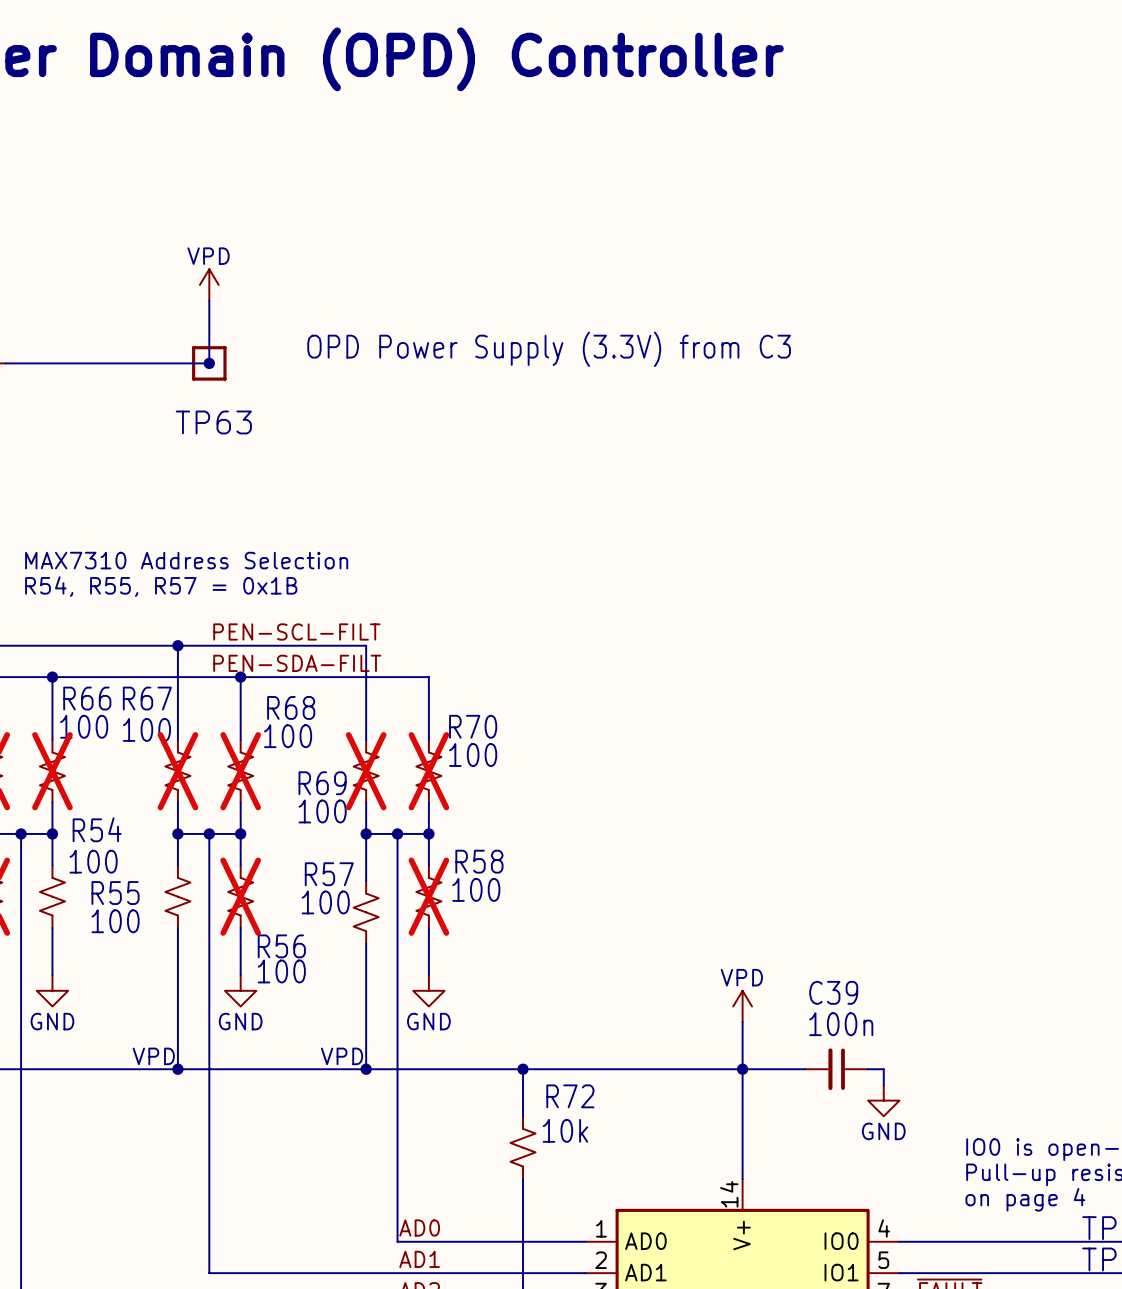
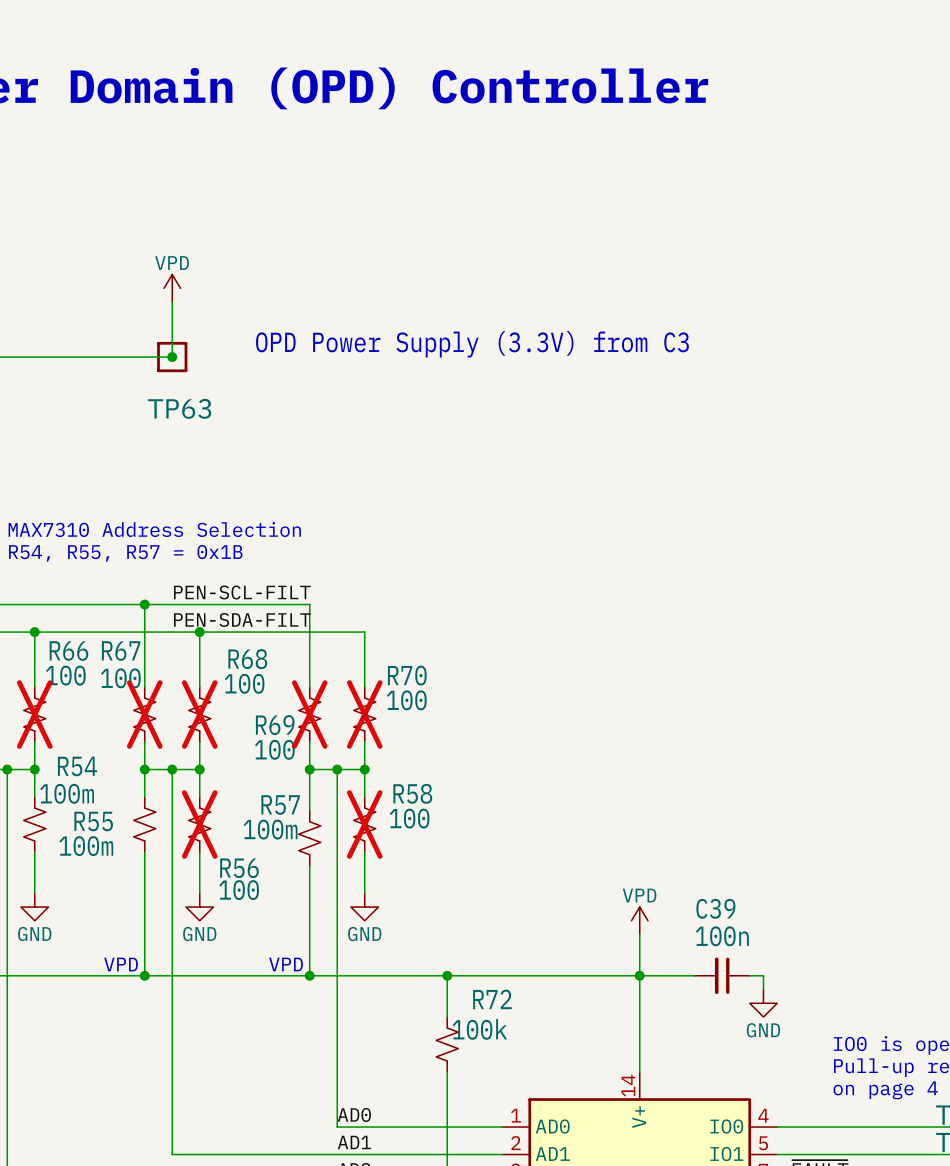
R54 value: 100 (93, 861) -> 100m (67, 793)
R57 value: 100 (325, 902) -> 100m (270, 829)
R55 value: 100 (115, 921) -> 100m (86, 846)
R72 value: 10k (565, 1130) -> 100k (479, 1029)

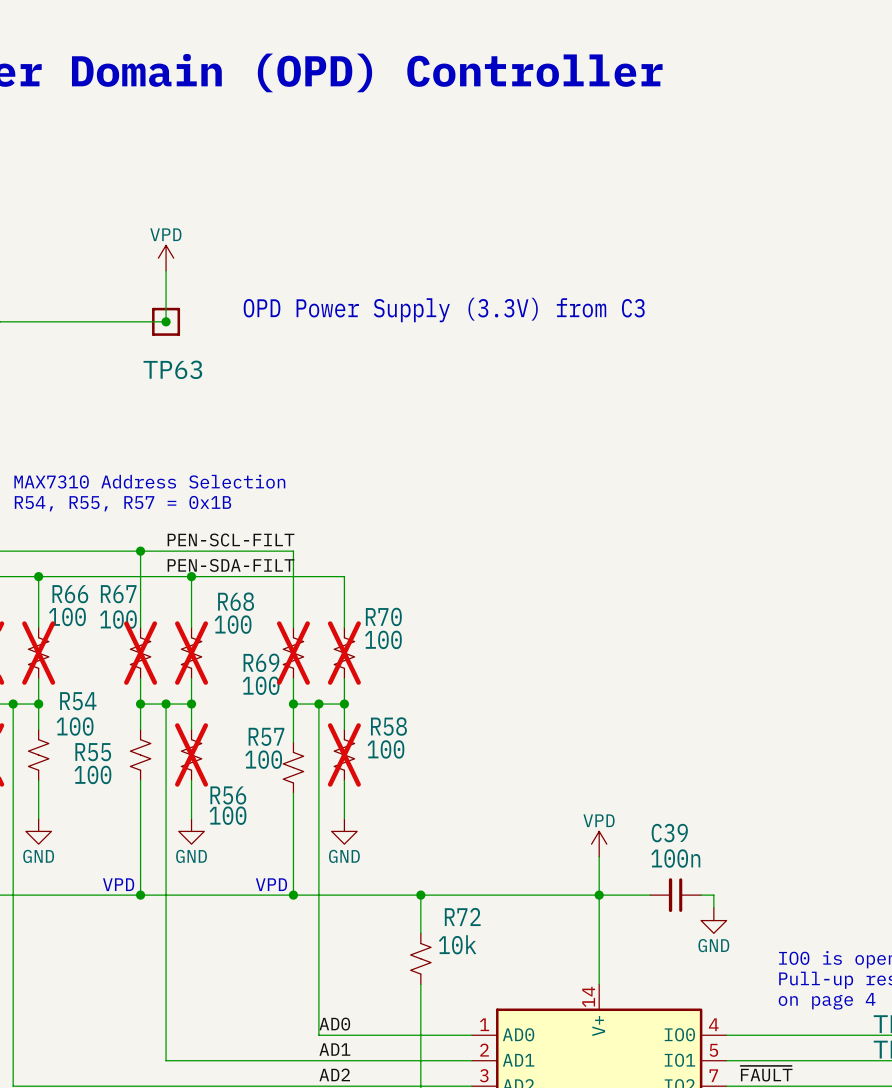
R54 value: 100m (67, 793) -> 100 (75, 726)
R57 value: 100m (270, 829) -> 100 (263, 759)
R55 value: 100m (86, 846) -> 100 (92, 774)
R72 value: 100k (479, 1029) -> 10k (457, 944)

